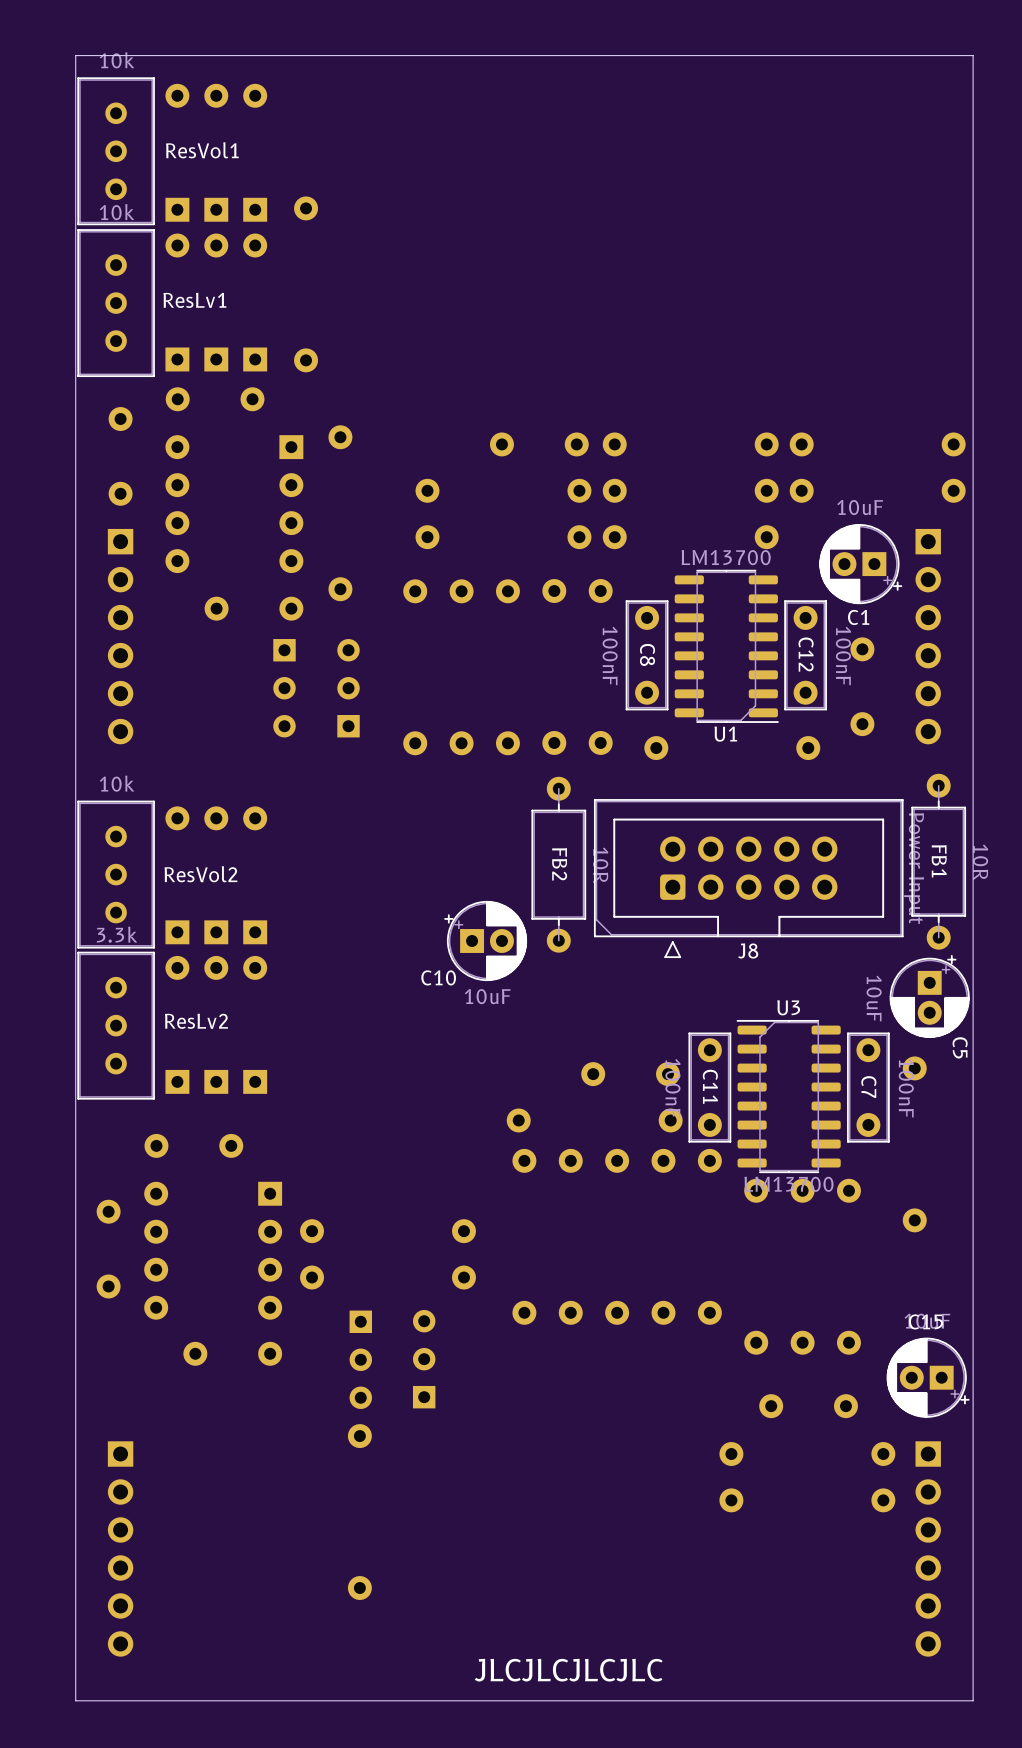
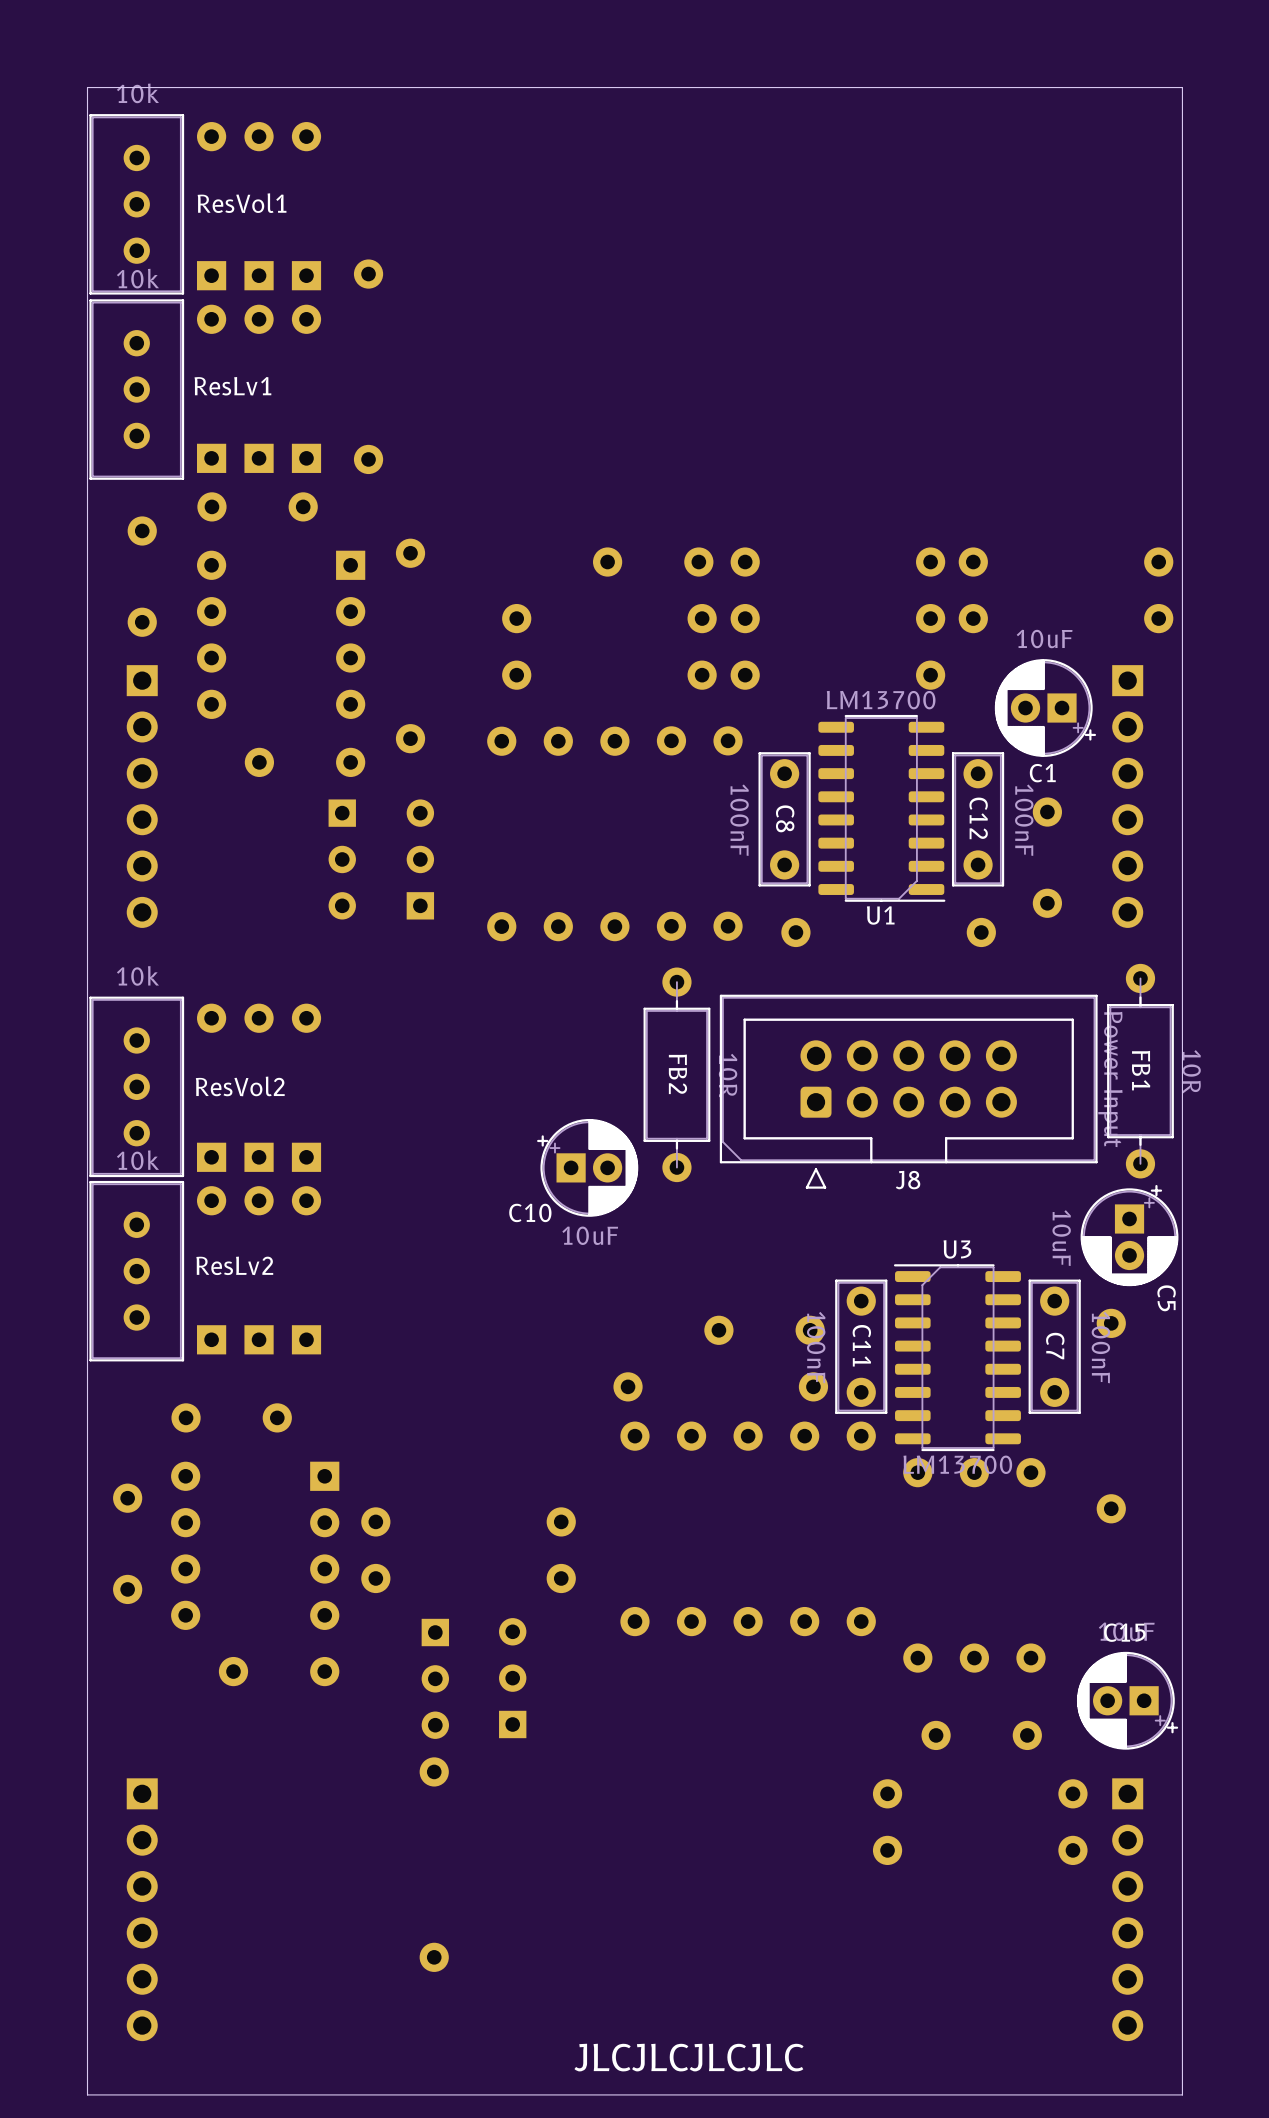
ResLv2 value: 3.3k (117, 934) -> 10k (137, 1160)

